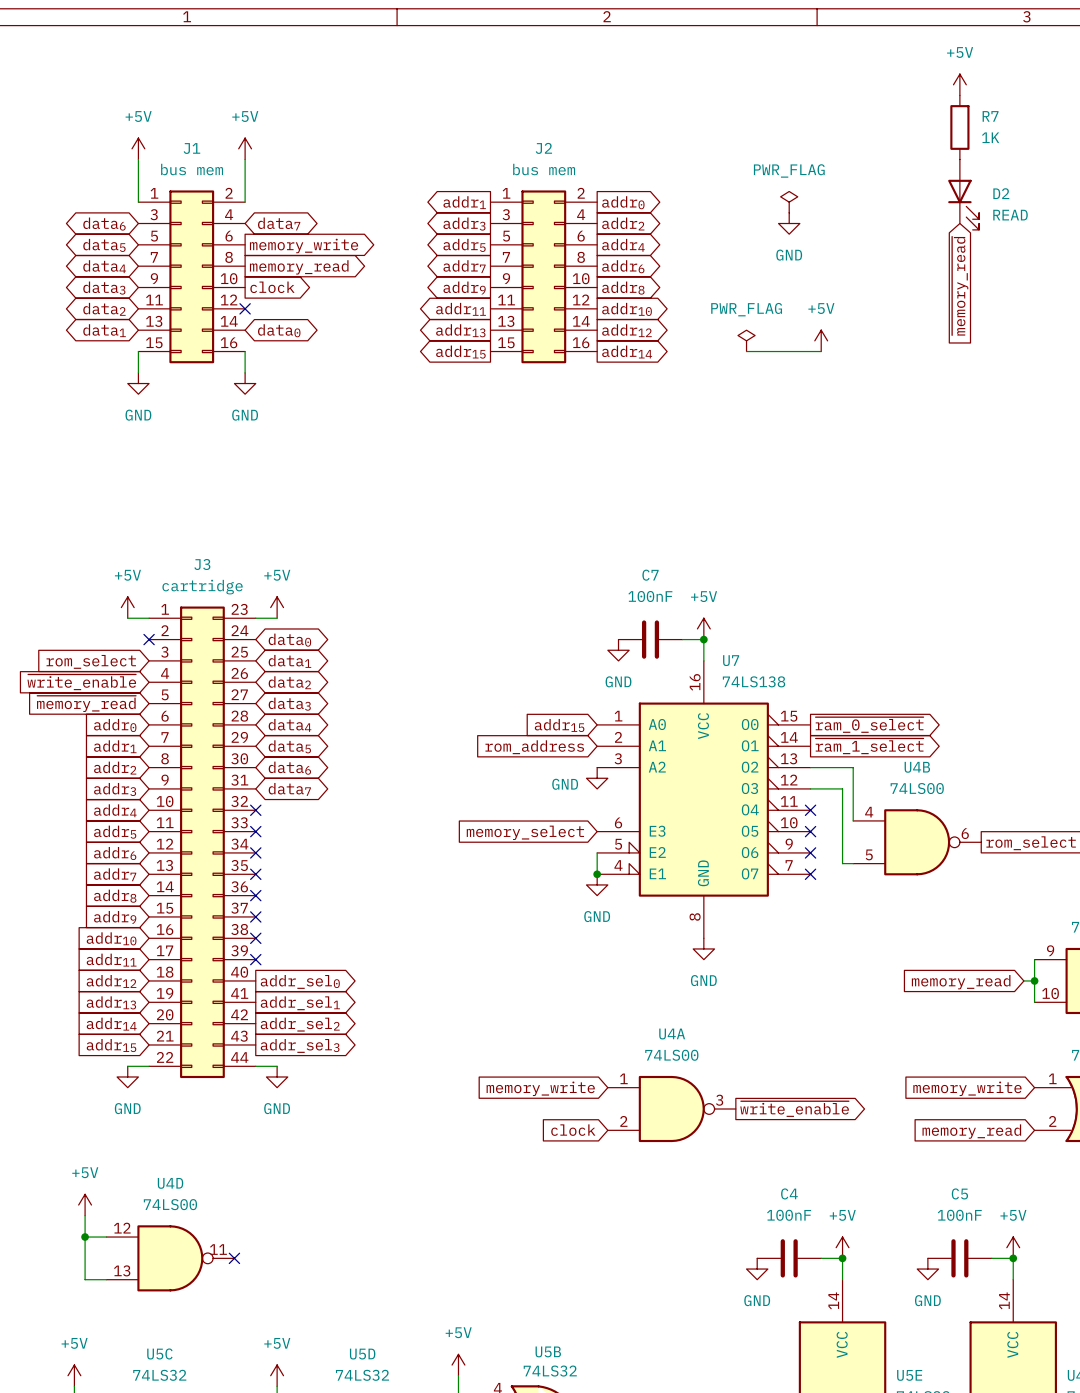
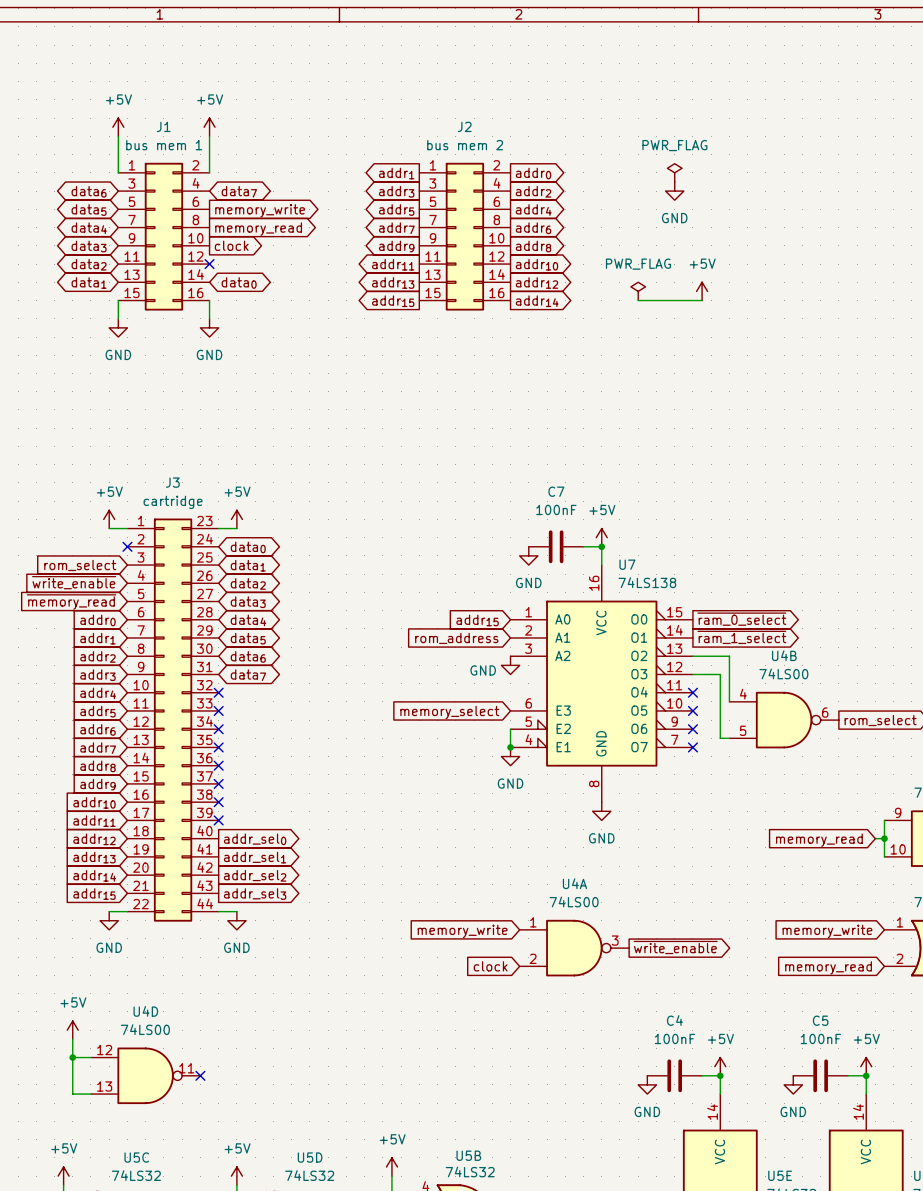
power symbol: +5V (959, 84) -> none
R7: 1K (959, 127) -> none
J1 value: bus mem (192, 169) -> bus mem 1 (164, 145)
J2 value: bus mem (544, 169) -> bus mem 2 (465, 145)
D2: READ (963, 194) -> none
global label: ~{memory_read} (960, 286) -> none

